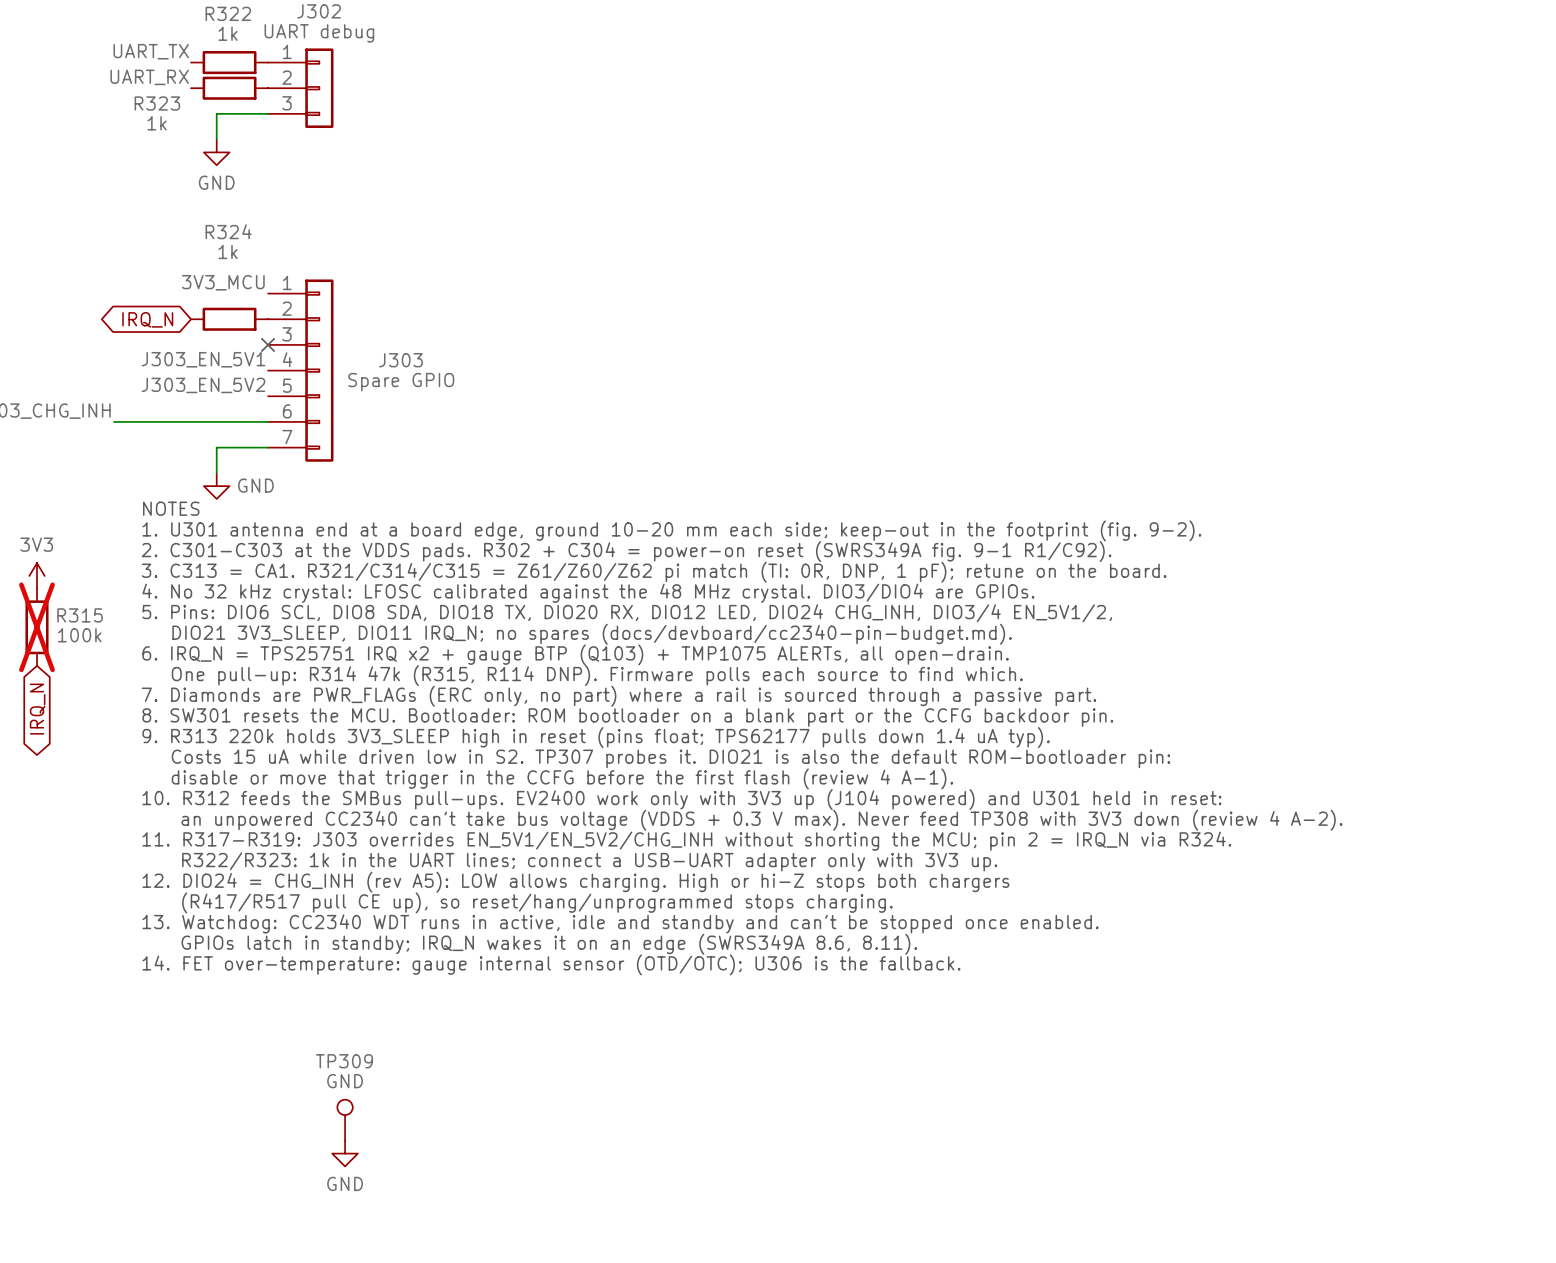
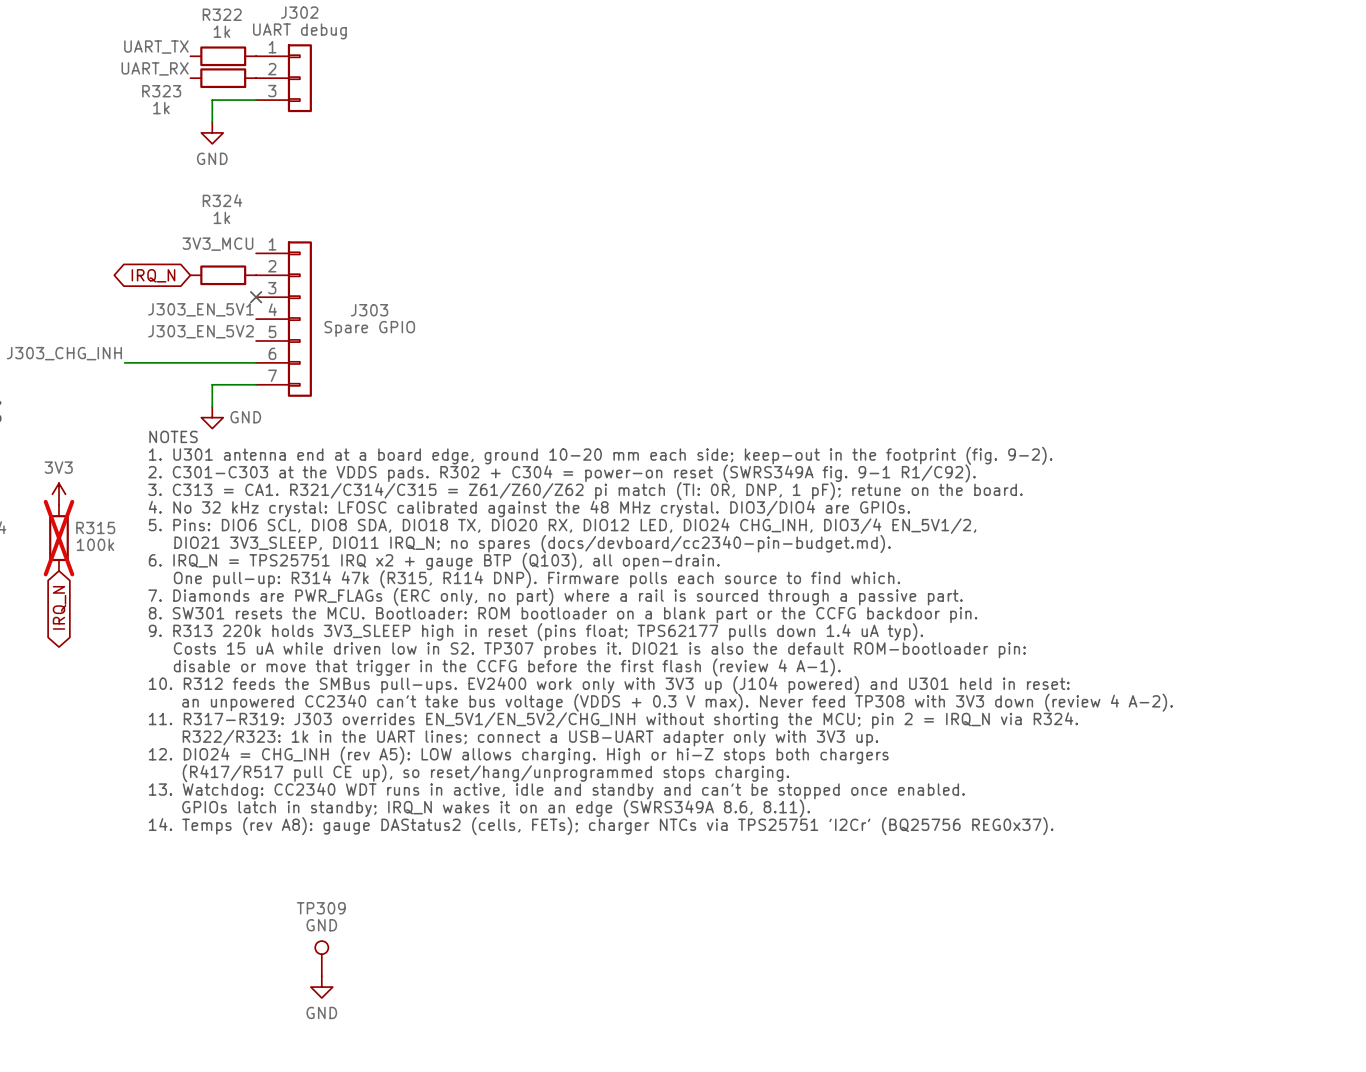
text: 6. IRQ_N = TPS25751 IRQ x2 + gauge BTP (Q103) + TMP1075 ALERTs, all open-drain. (575, 654) -> 6. IRQ_N = TPS25751 IRQ x2 + gauge BTP (Q103), all open-drain. (434, 561)
text: 14. FET over-temperature: gauge internal sensor (OTD/OTC); U306 is the fallback. (551, 964) -> 14. Temps (rev A8): gauge DAStatus2 (cells, FETs); charger NTCs via TPS25751 'I2Cr' (BQ25756 REG0x37). (601, 826)

